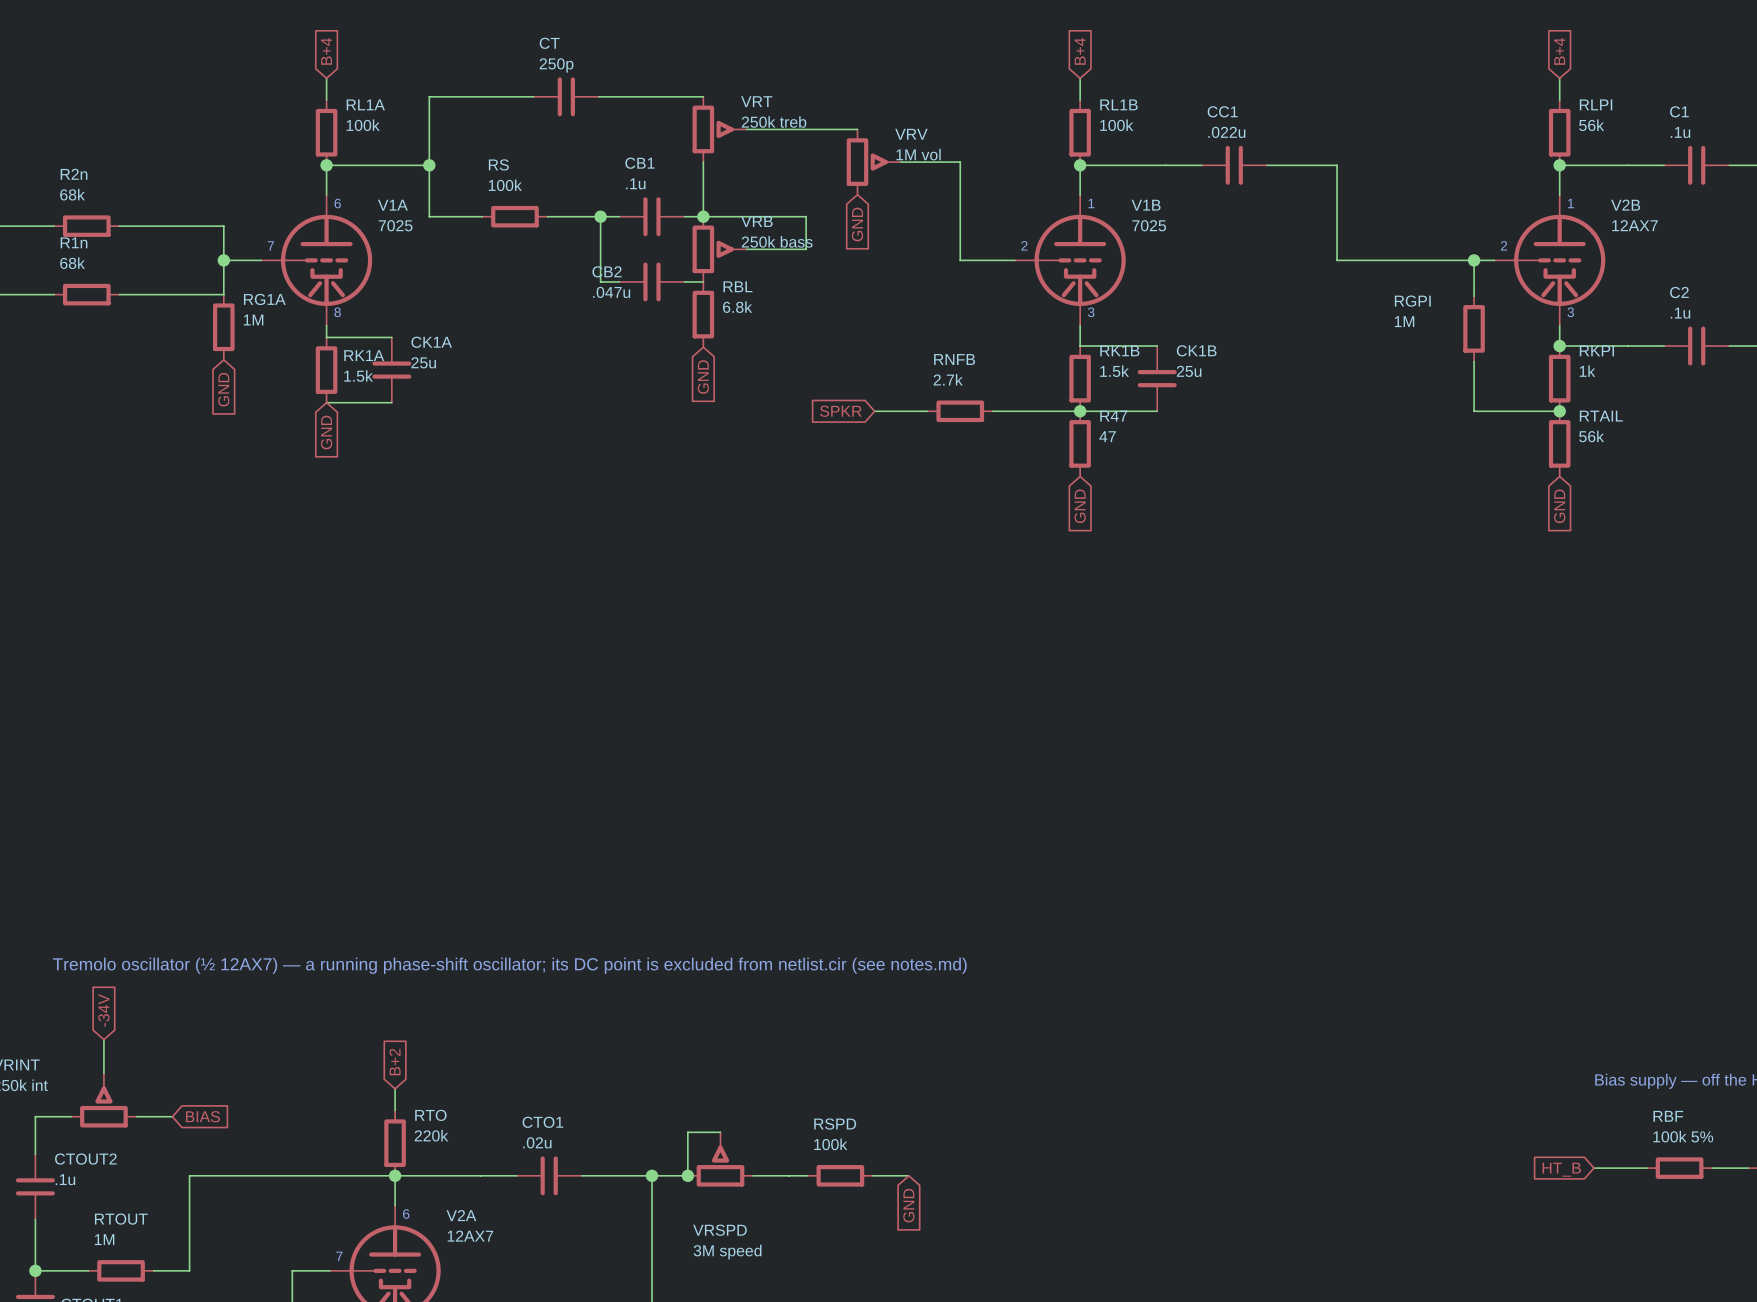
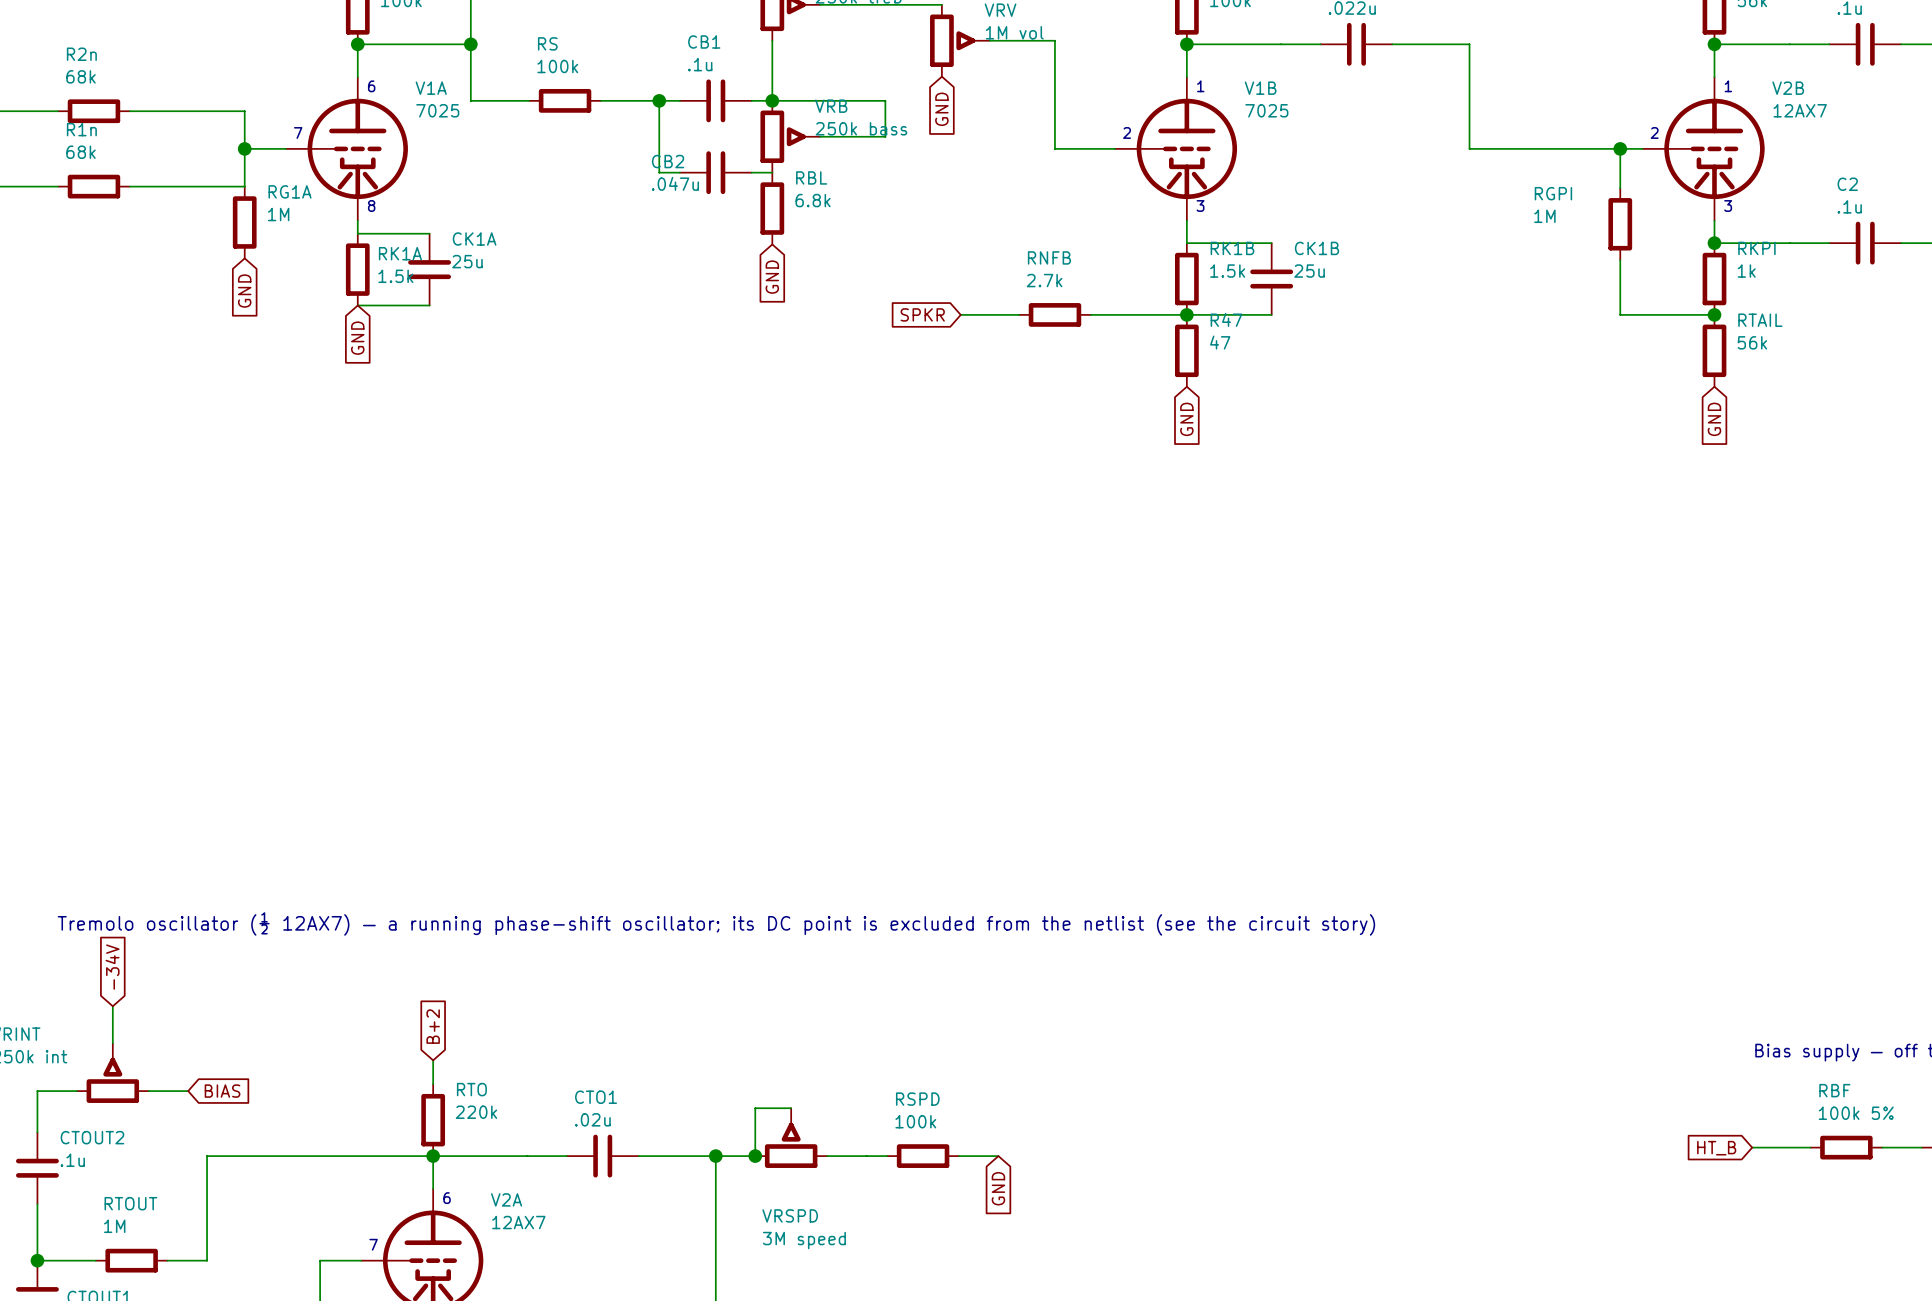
text: Tremolo oscillator (½ 12AX7) — a running phase-shift oscillator; its DC point is excluded from netlist.cir (see notes.md) (509, 965) -> Tremolo oscillator (½ 12AX7) — a running phase-shift oscillator; its DC point is excluded from the netlist (see the circuit story) (716, 923)

